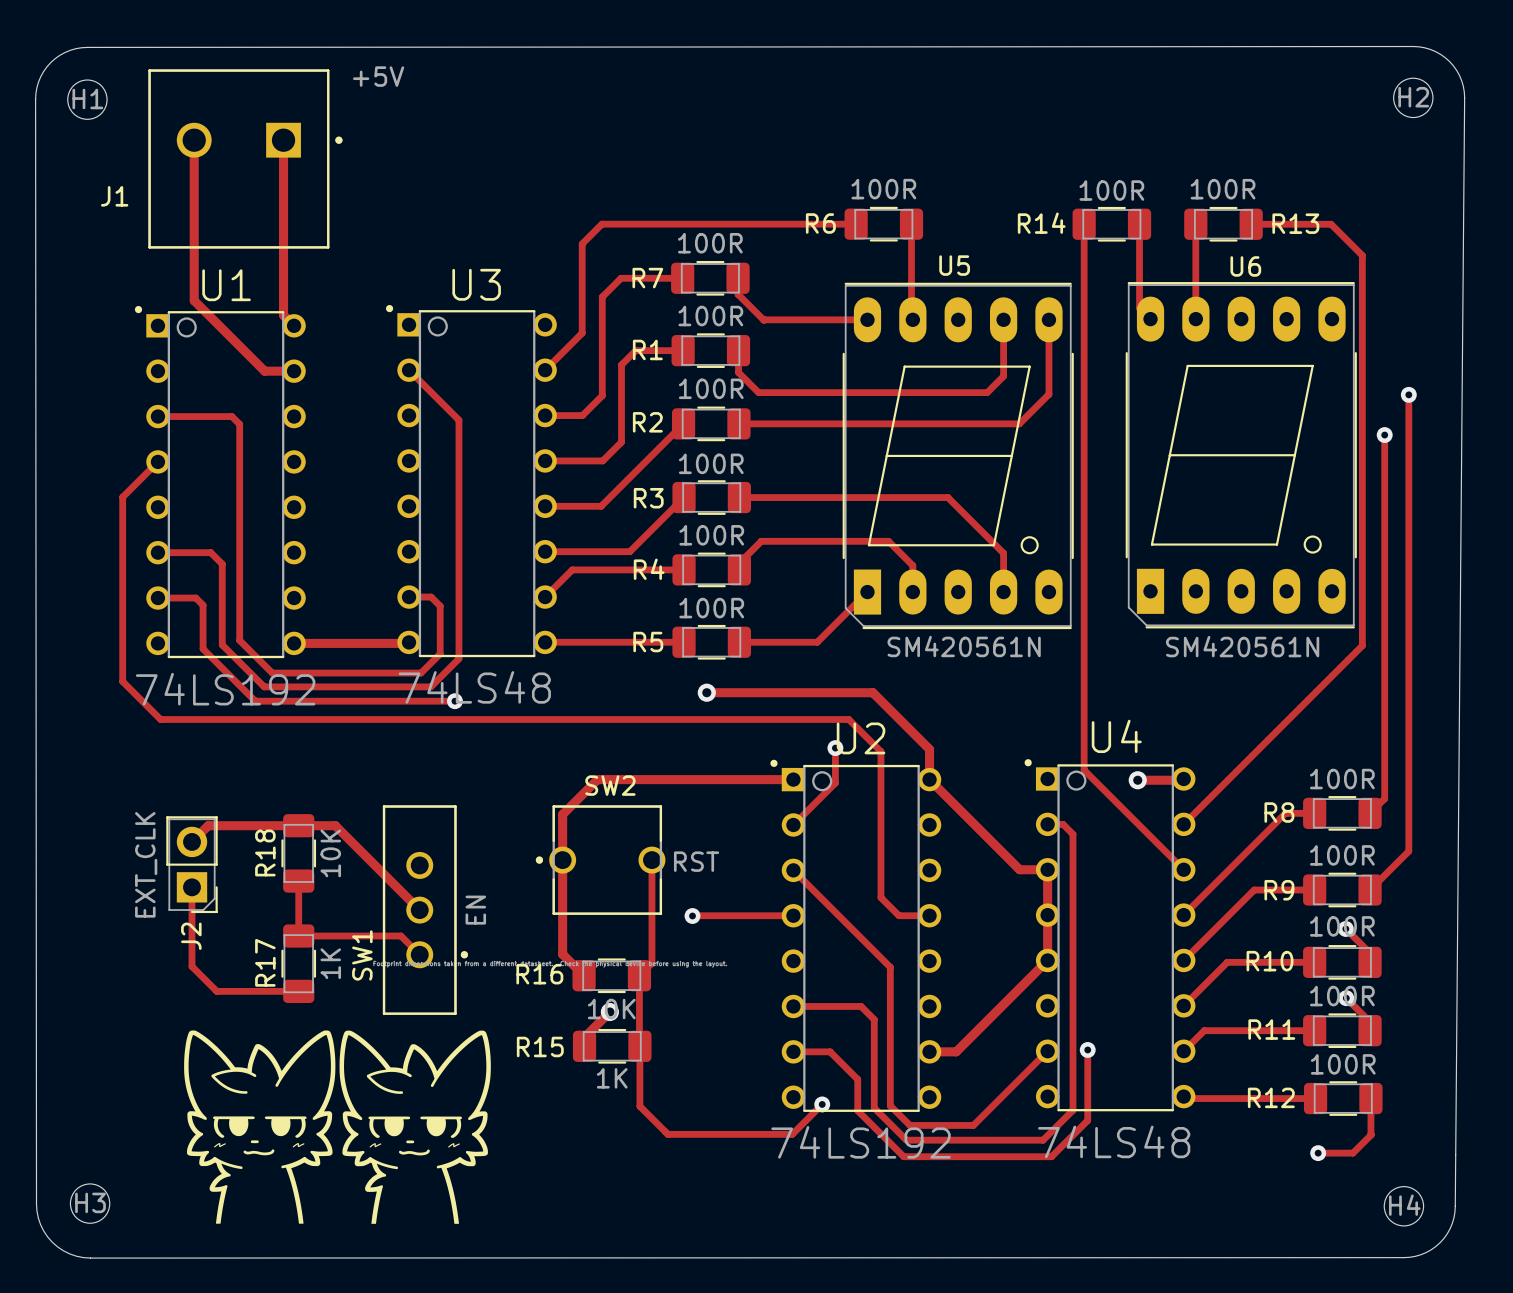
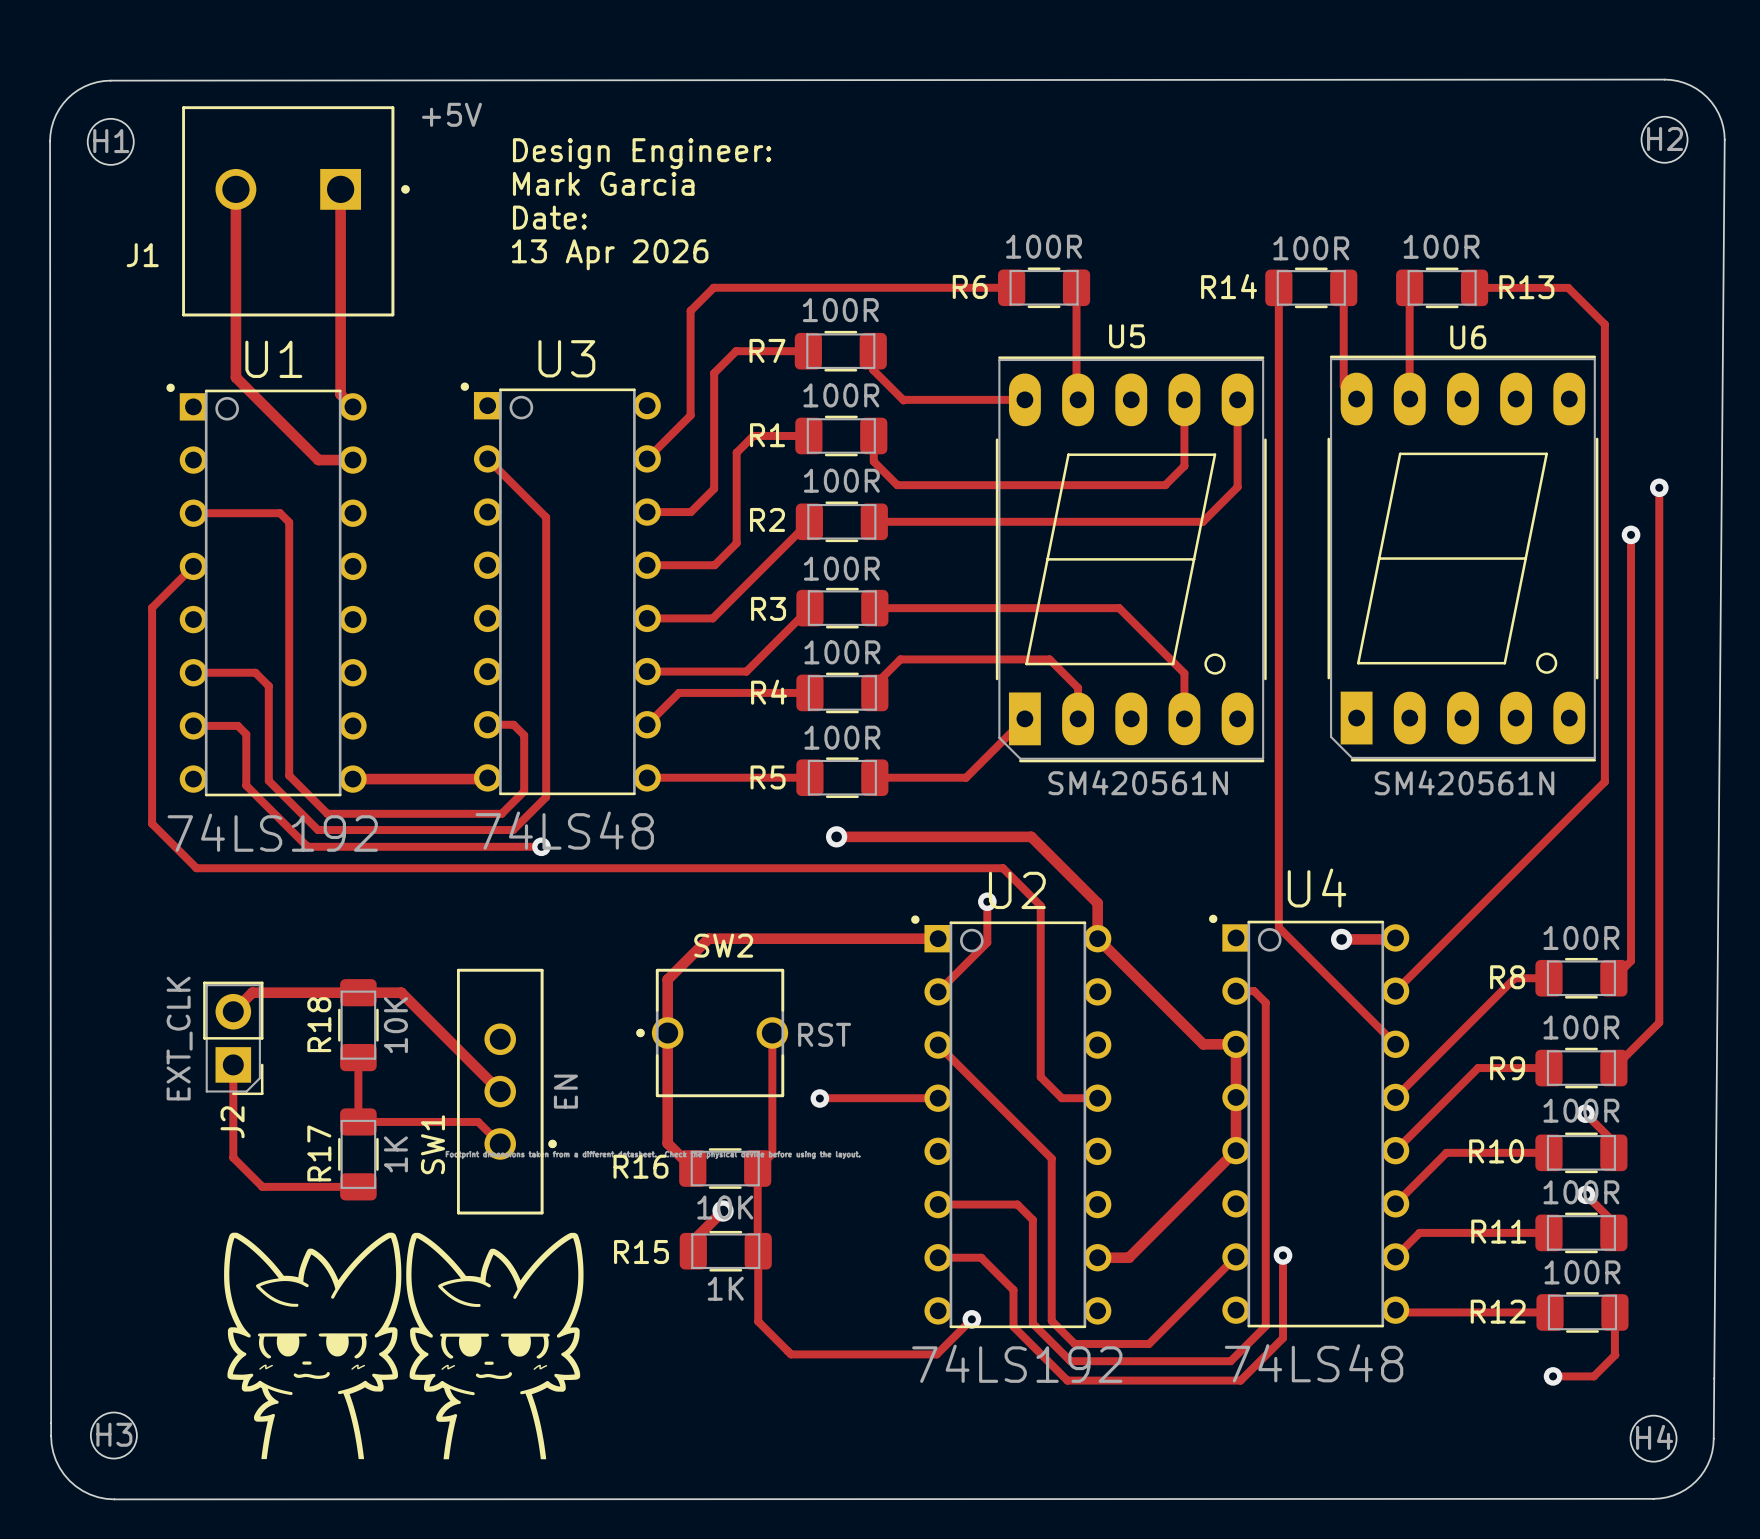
text: none -> Design Engineer: (642, 153)
text: none -> Mark Garcia (603, 183)
text: none -> Date: (549, 217)
text: none -> 13 Apr 2026 (610, 254)

